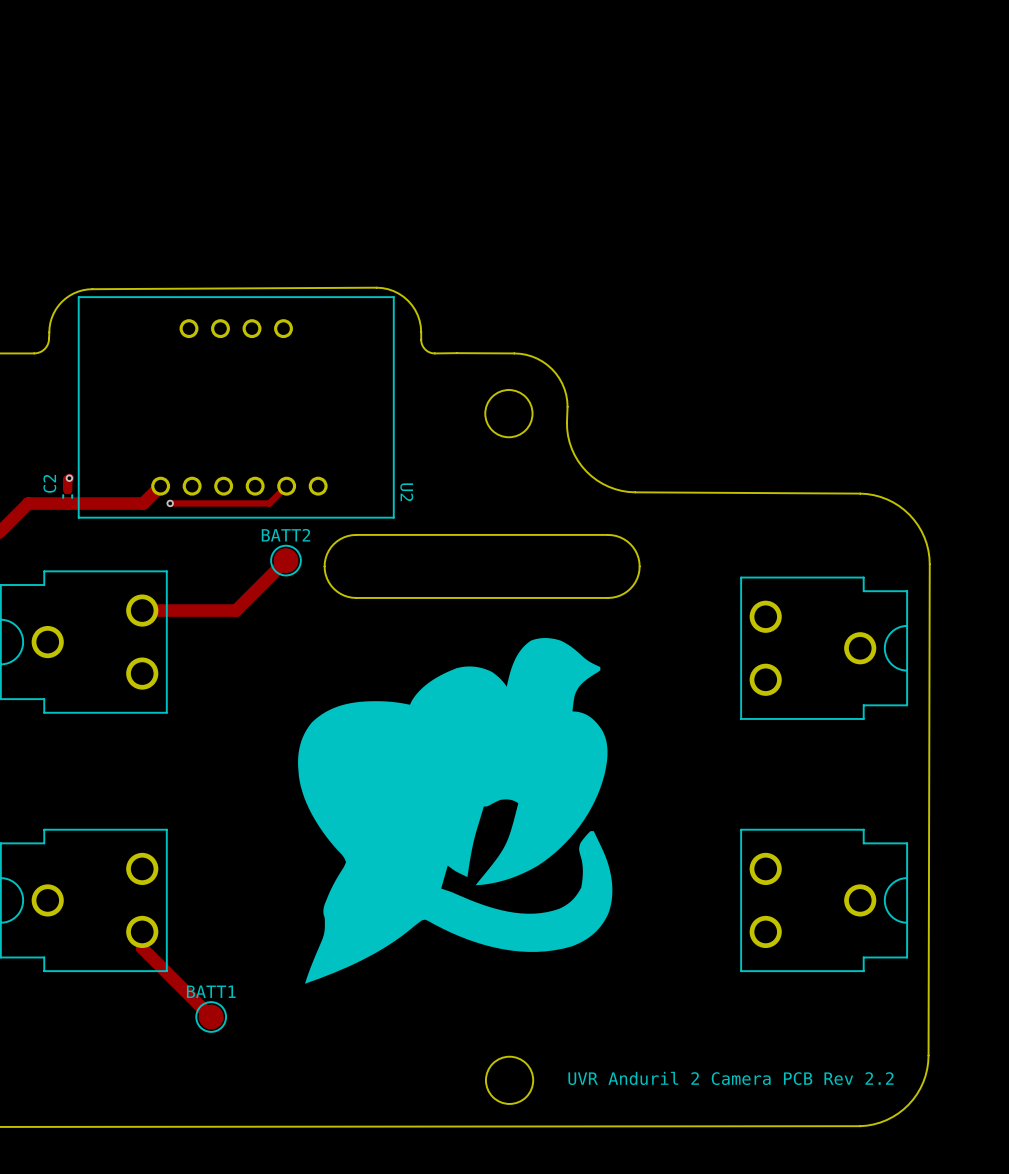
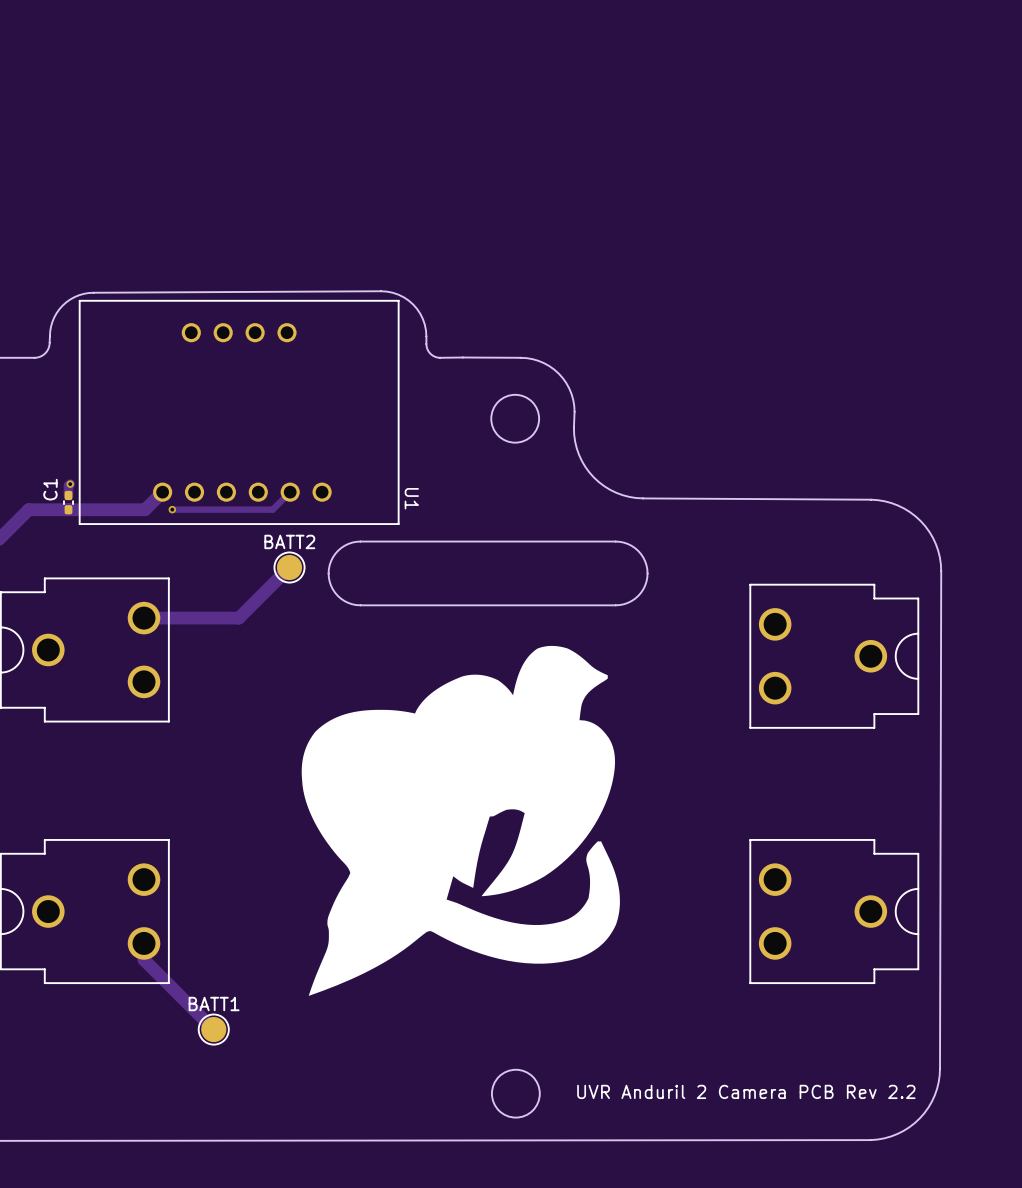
C2 name: C2 (49, 483) -> C1 (50, 489)
U2 name: U2 (406, 492) -> U1 (411, 498)

